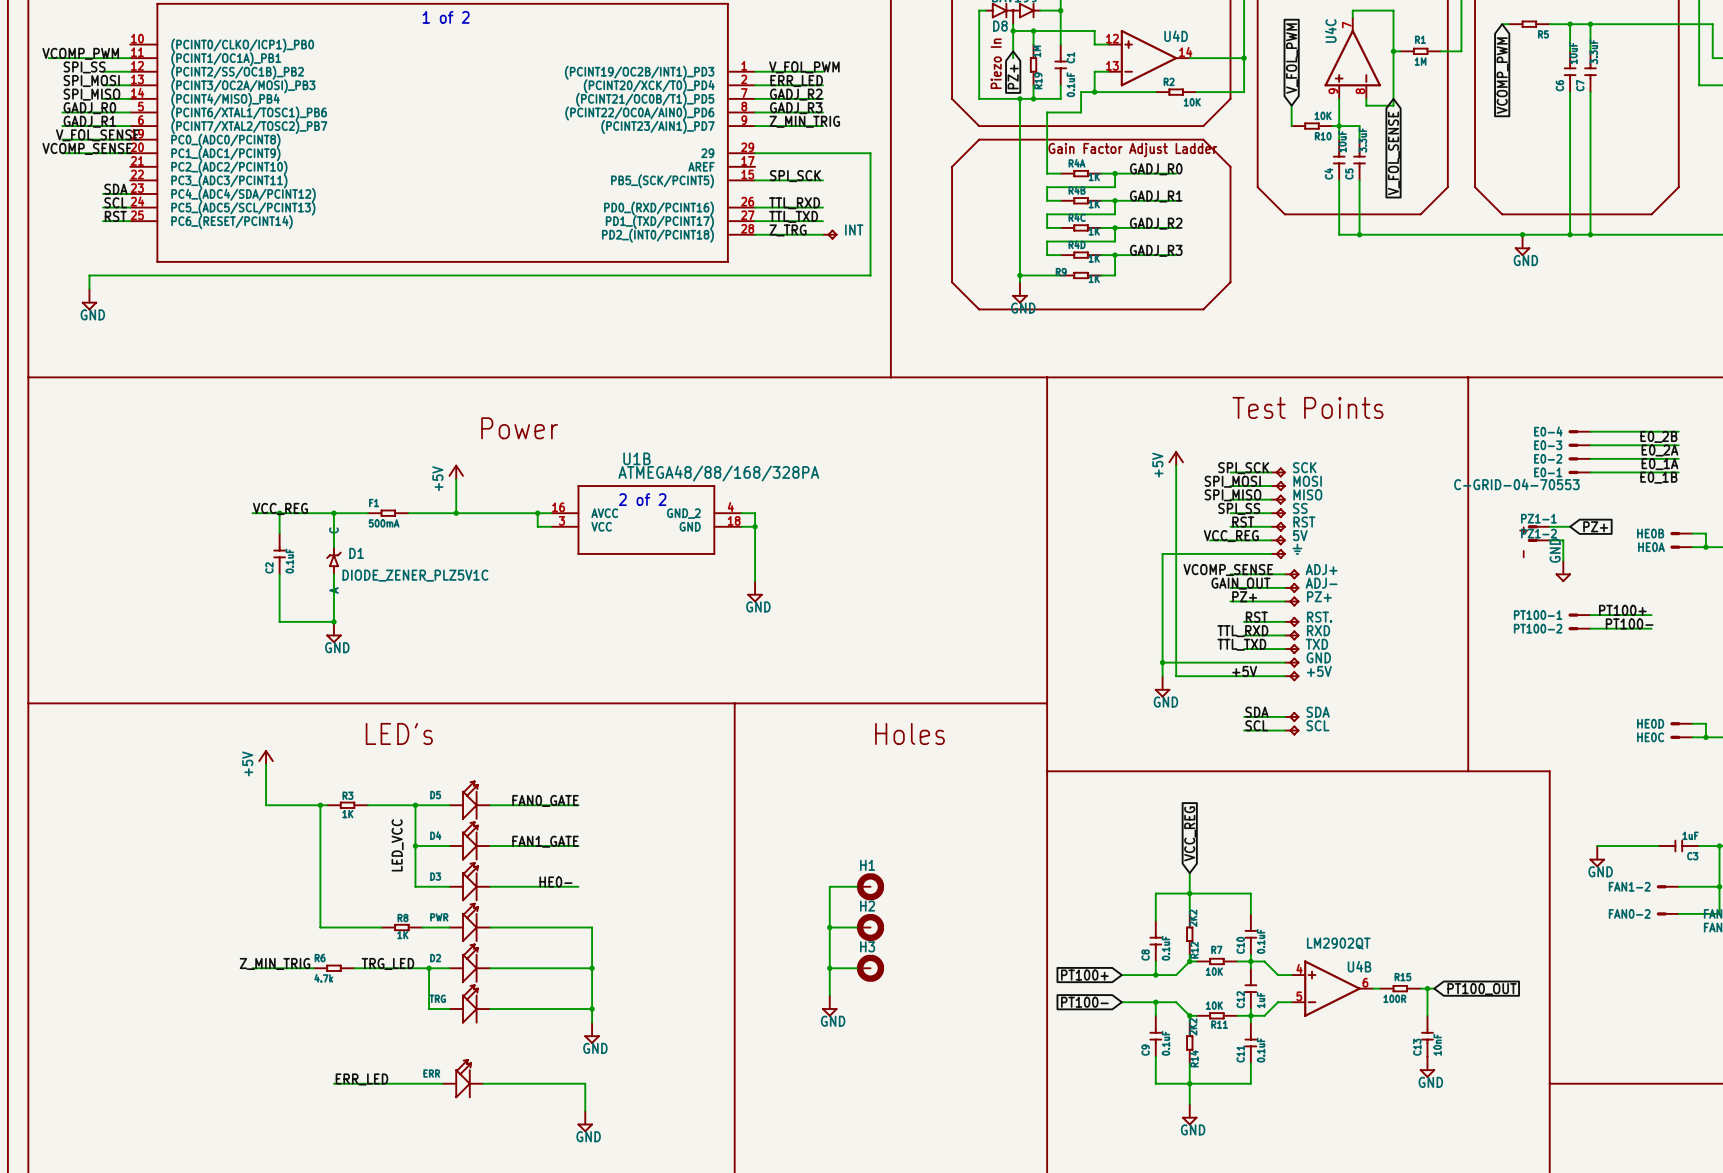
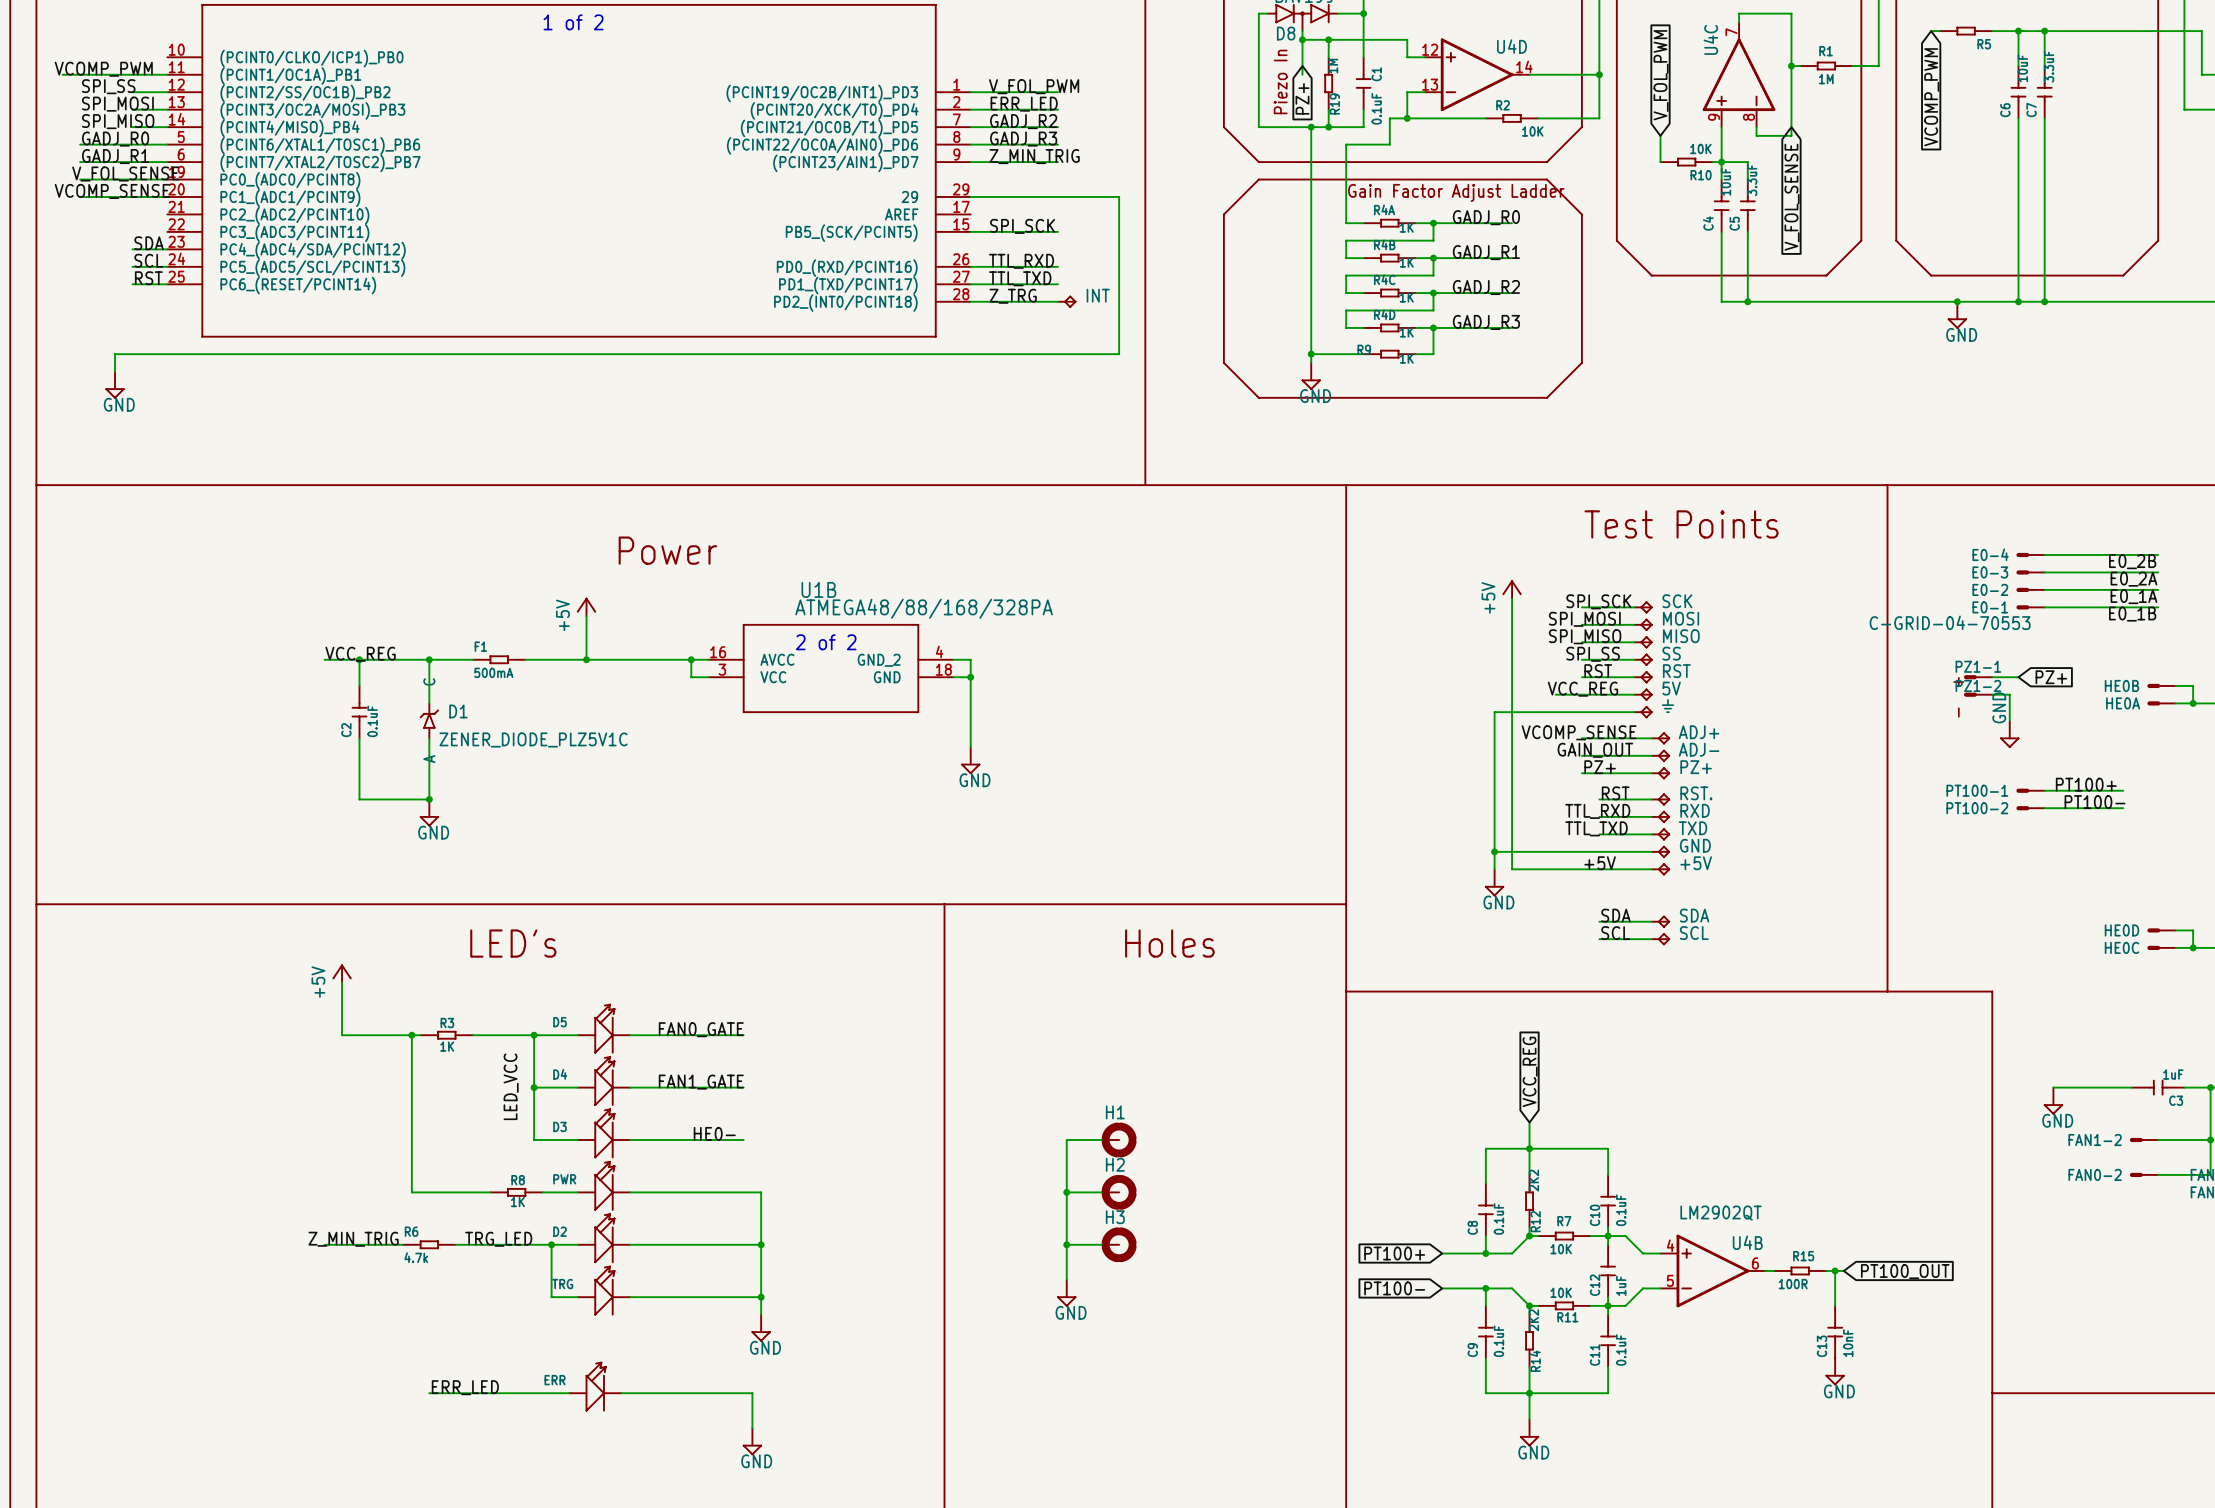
D1 value: DIODE_ZENER_PLZ5V1C (415, 575) -> ZENER_DIODE_PLZ5V1C (533, 739)

